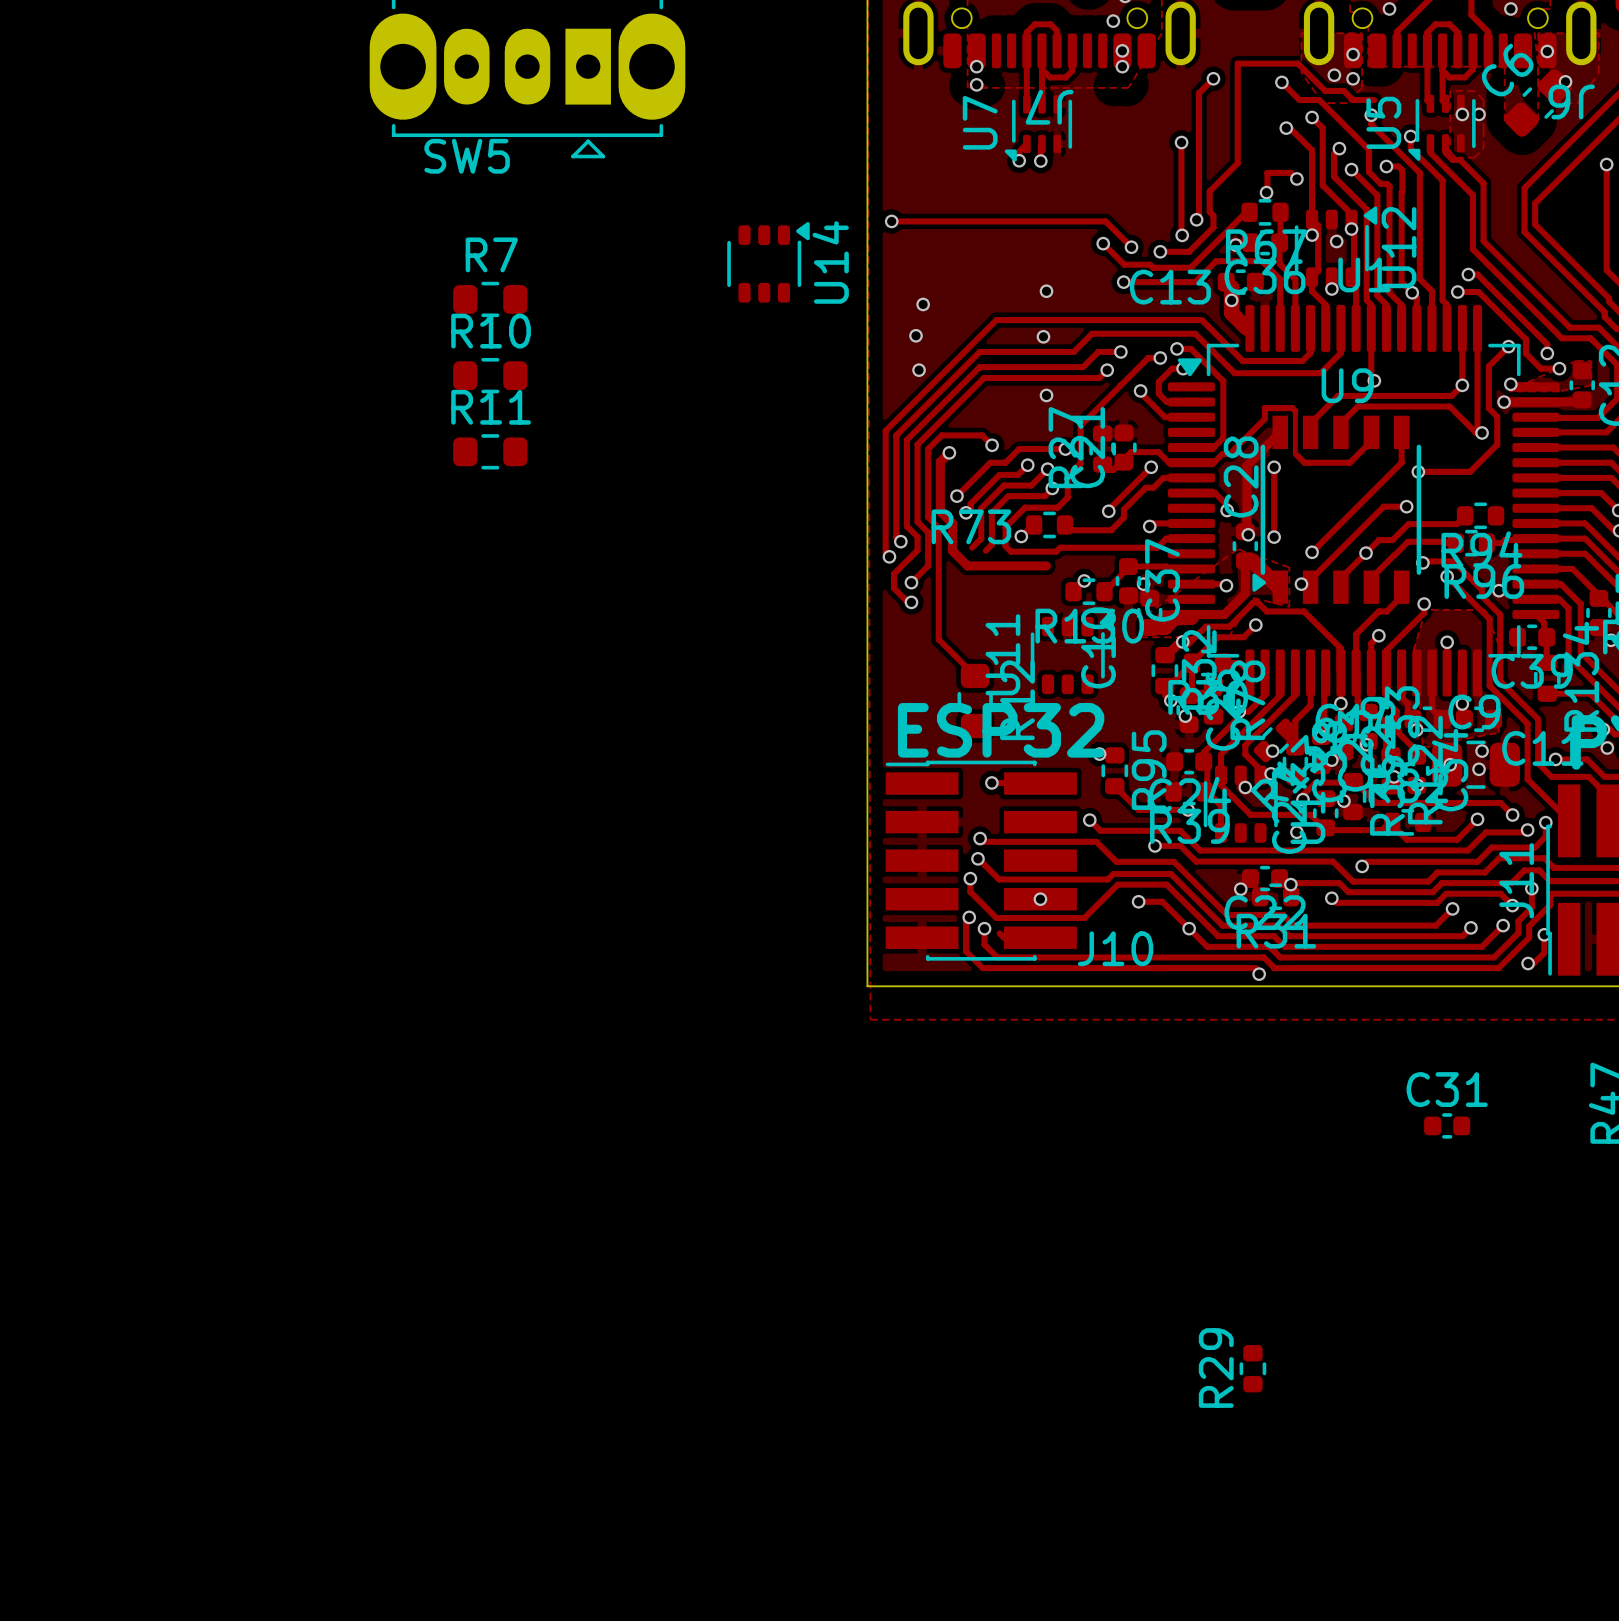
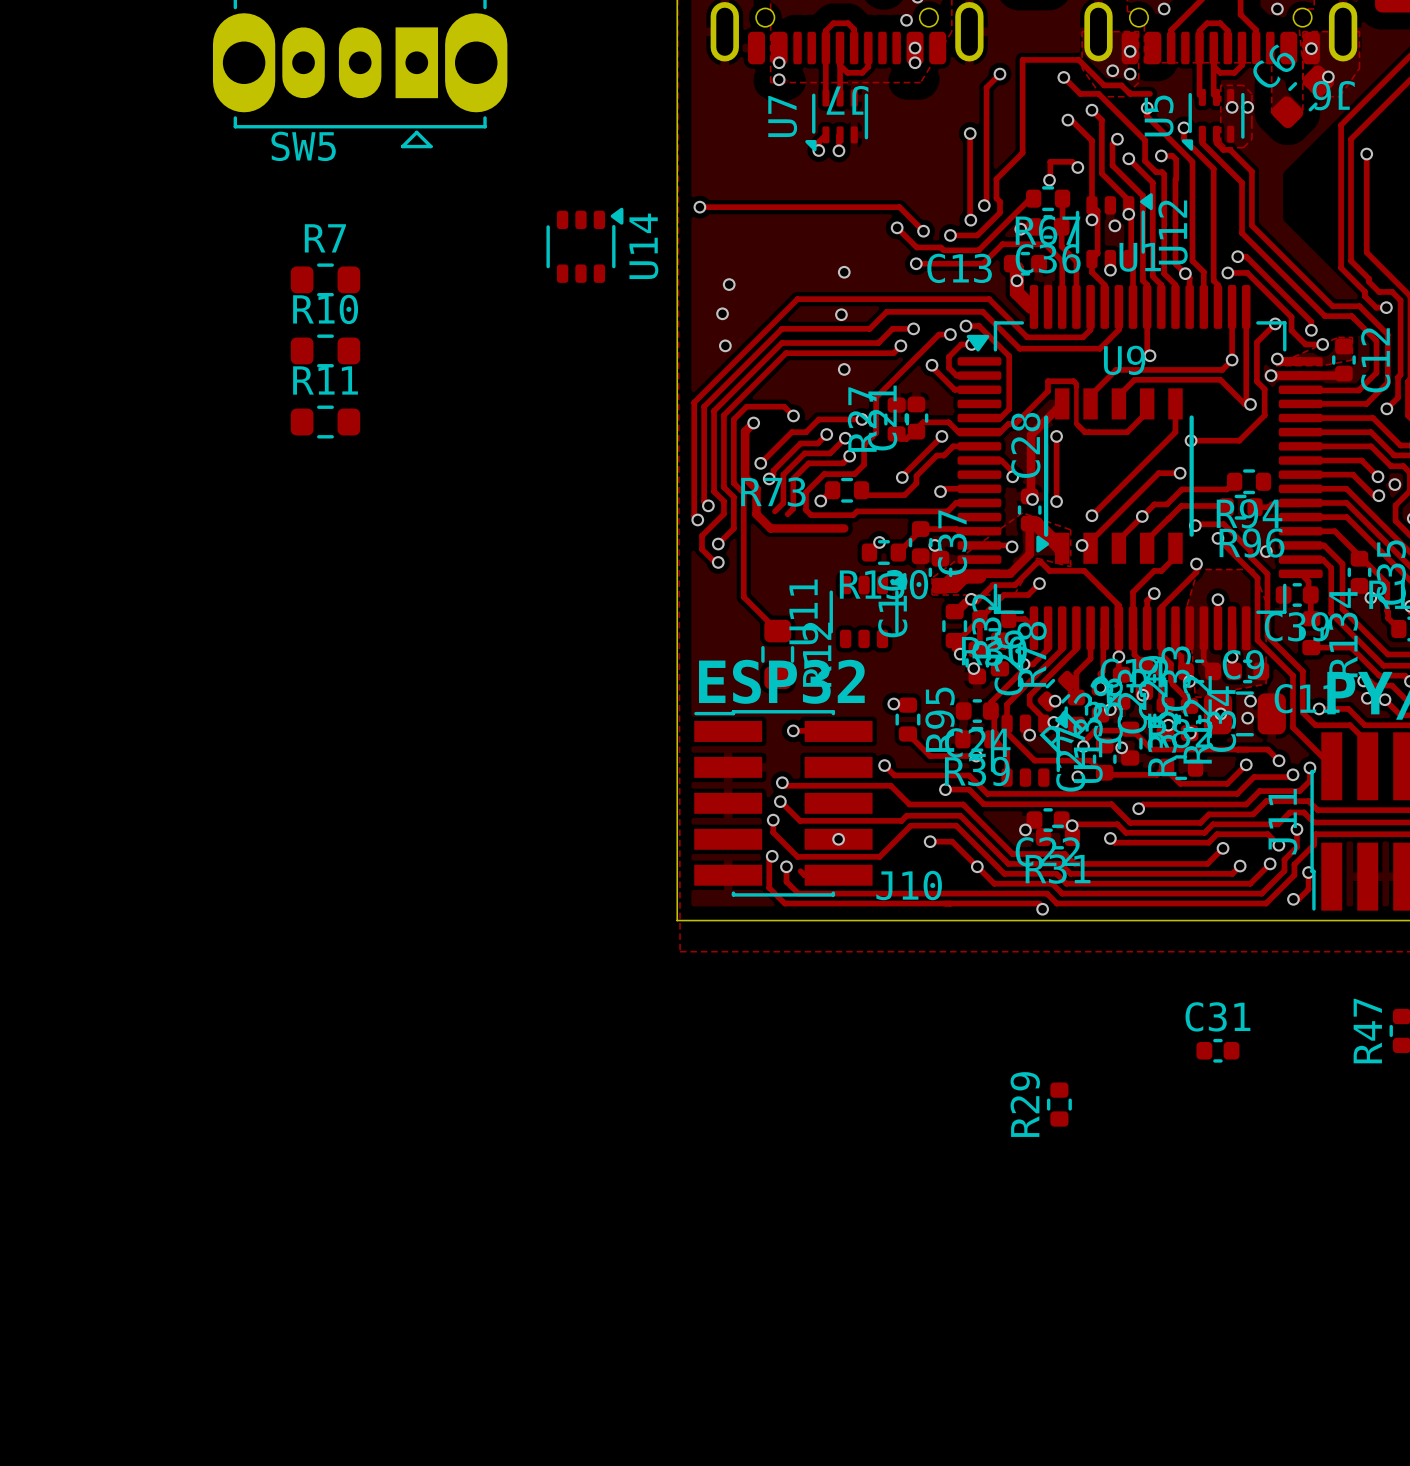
track: (1579, 133) (1524, 188) (1524, 232) (1579, 286) -> (1341, 125) (1341, 268)
track: (1589, 148) (1535, 203) (1535, 224) (1589, 279) -> (1351, 139) (1351, 260)
R29 position: (1252, 1368) -> (1059, 1104)

